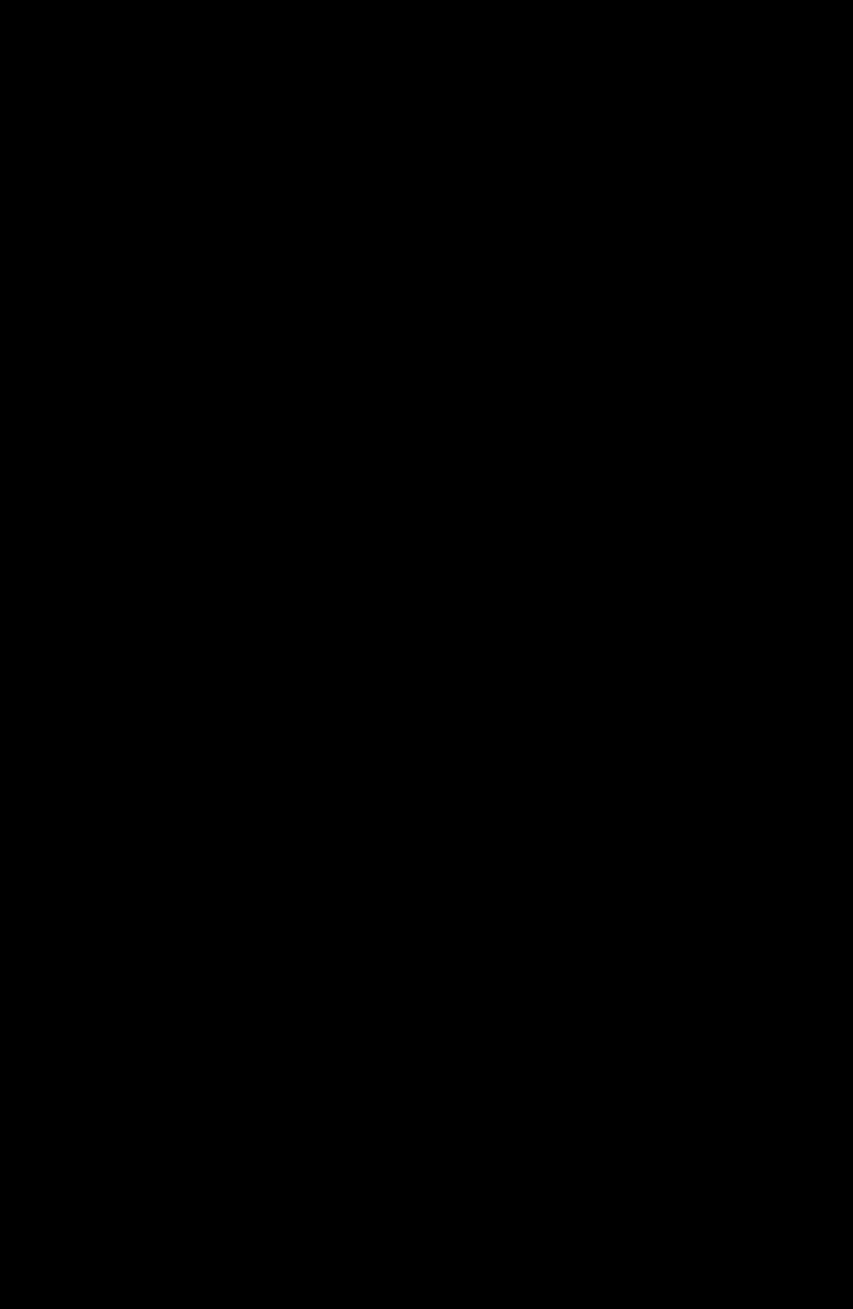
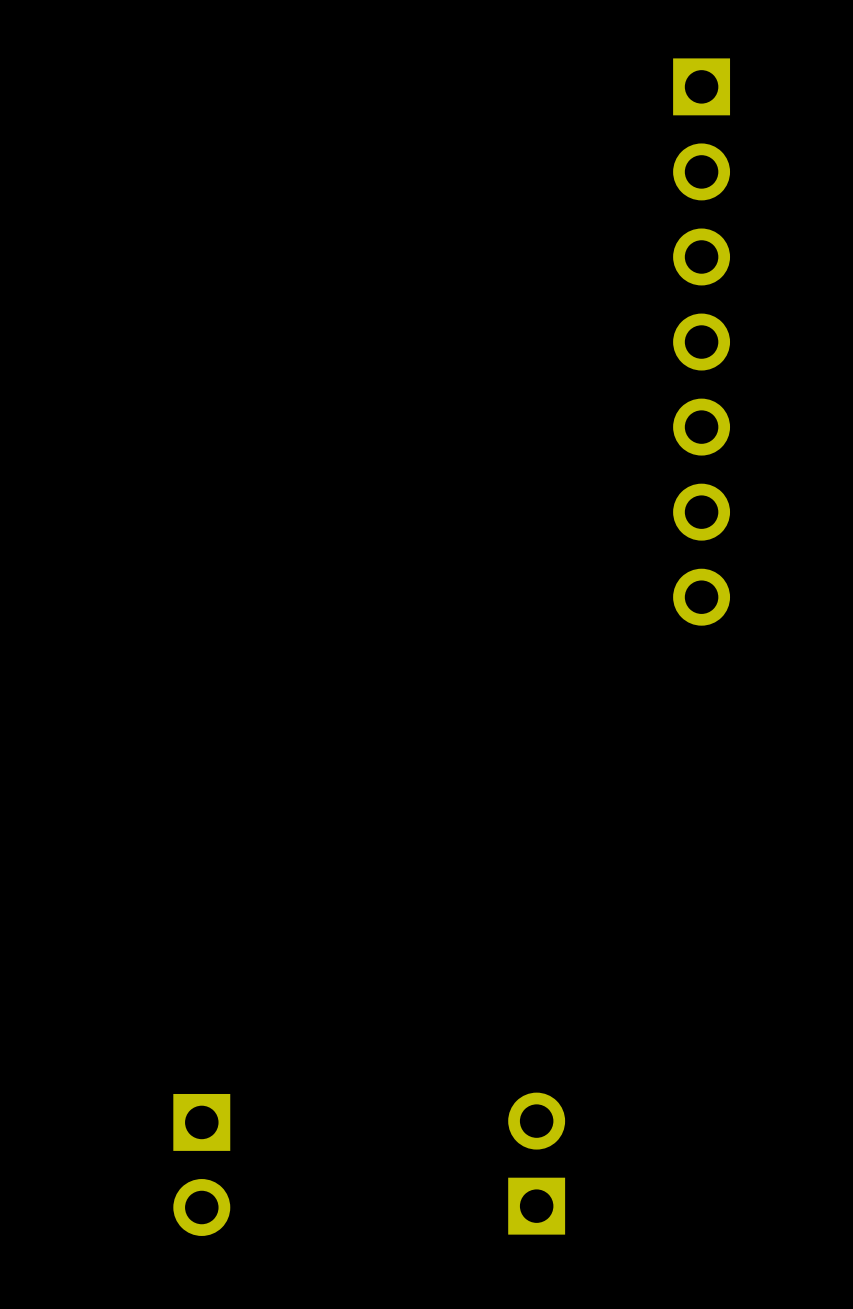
part: none -> (701, 342)
part: none -> (536, 1163)
part: none -> (201, 1164)

